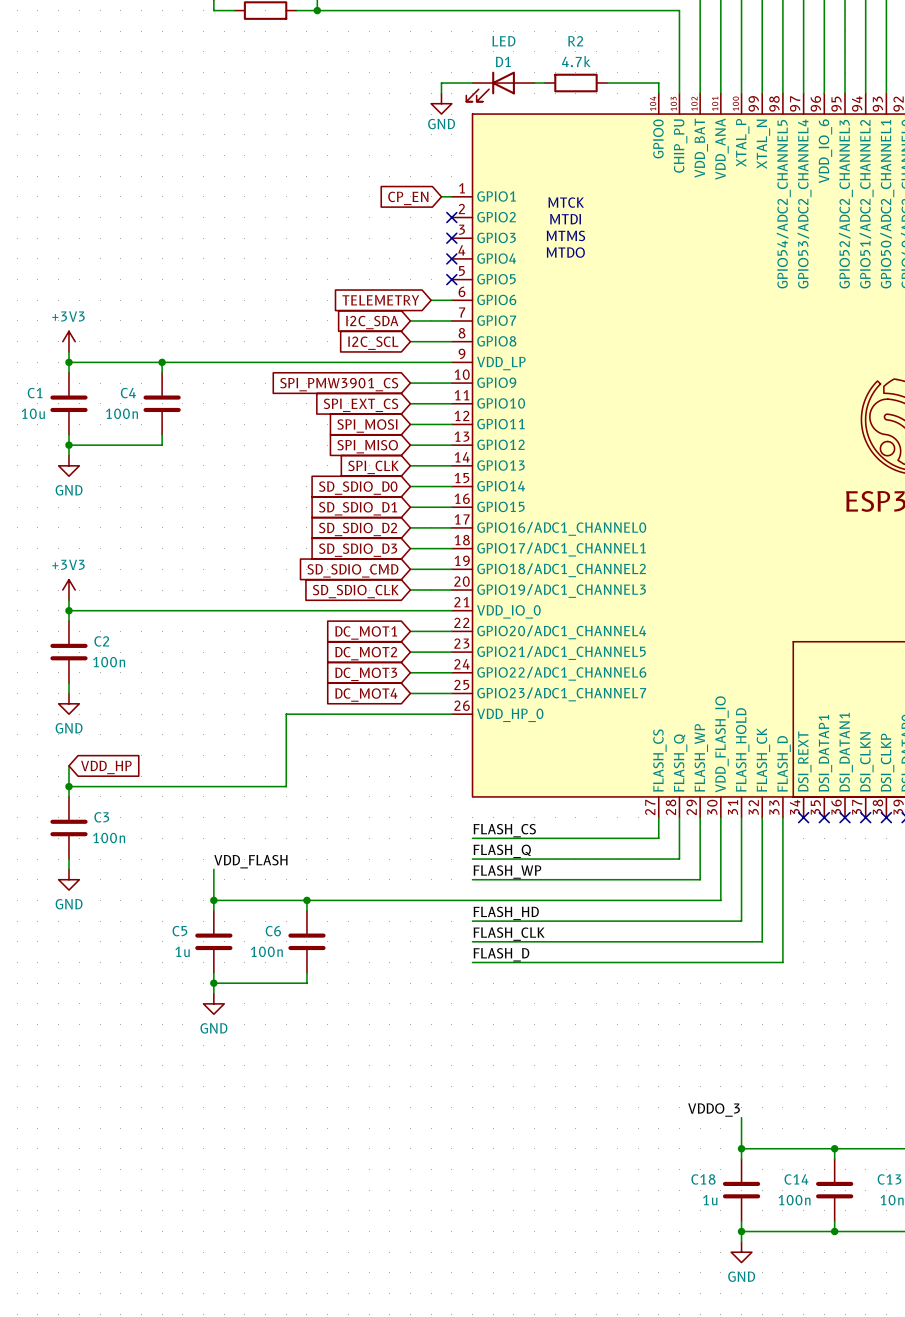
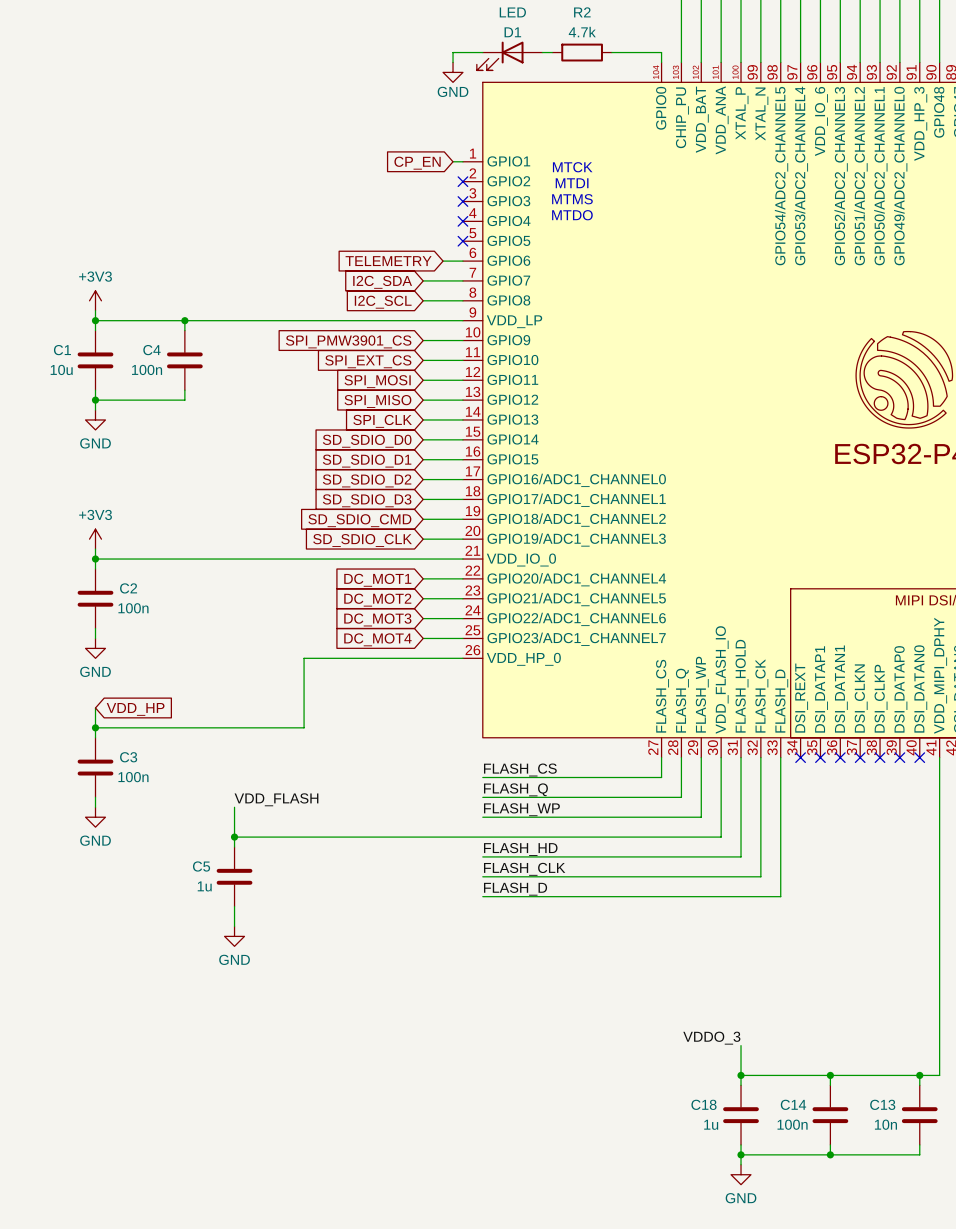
wire: (306, 900) (306, 910) -> none
junction: (306, 900) -> none
C6: 100n (306, 941) -> none
wire: (306, 972) (306, 983) (213, 983) -> none
junction: (213, 983) -> none

